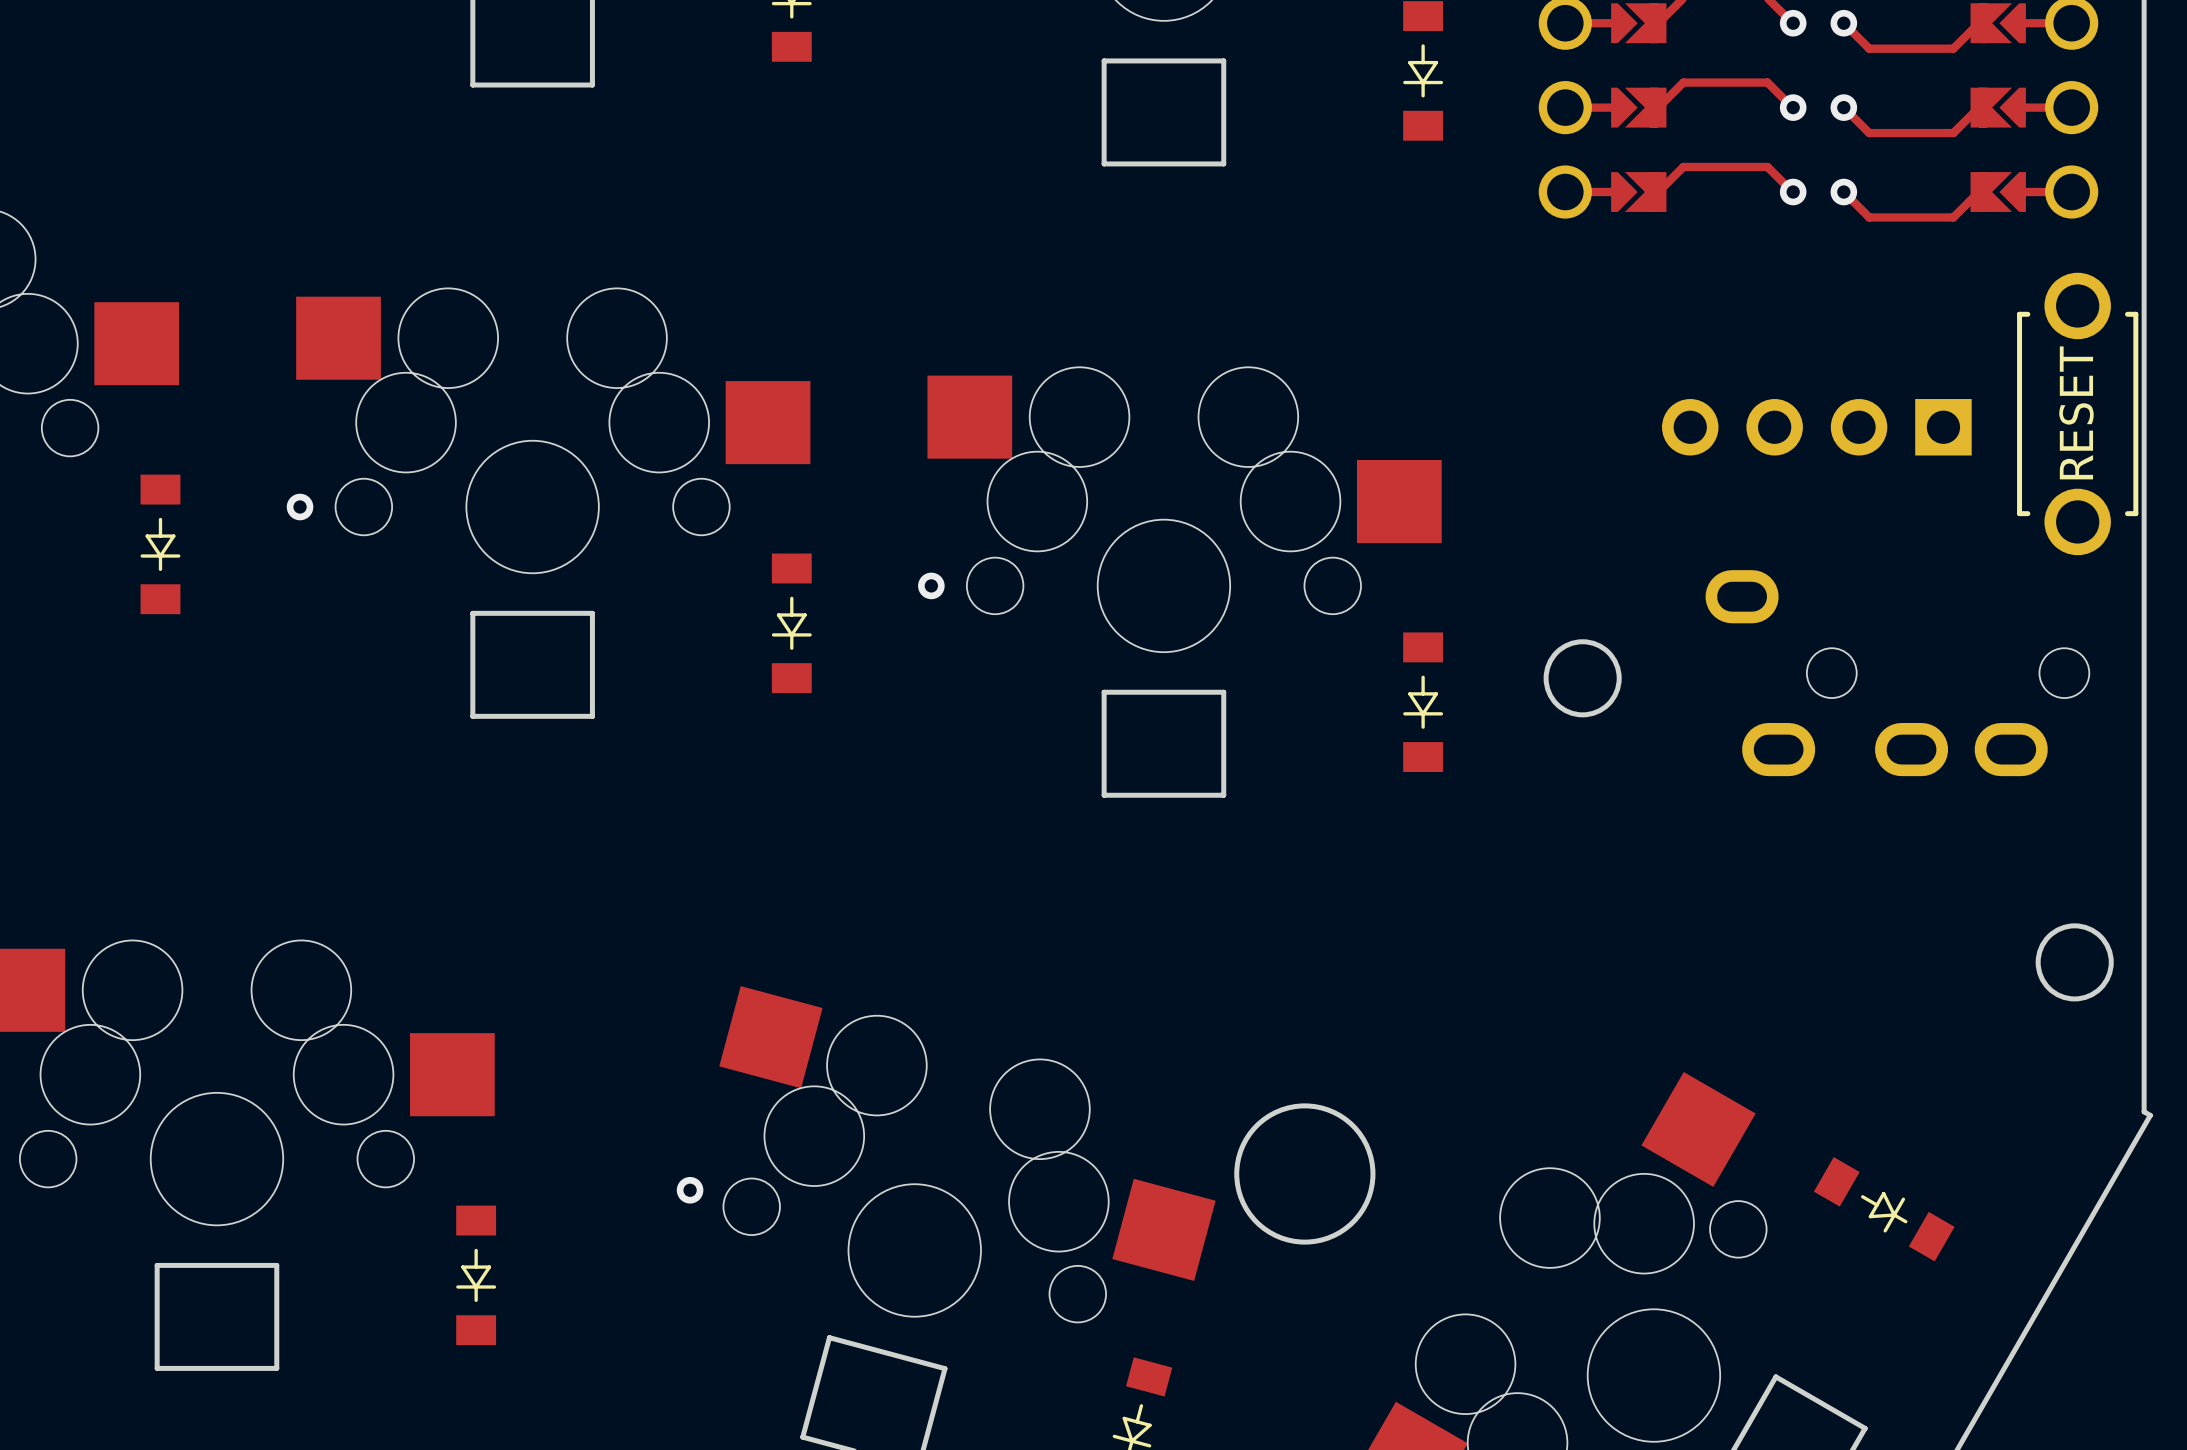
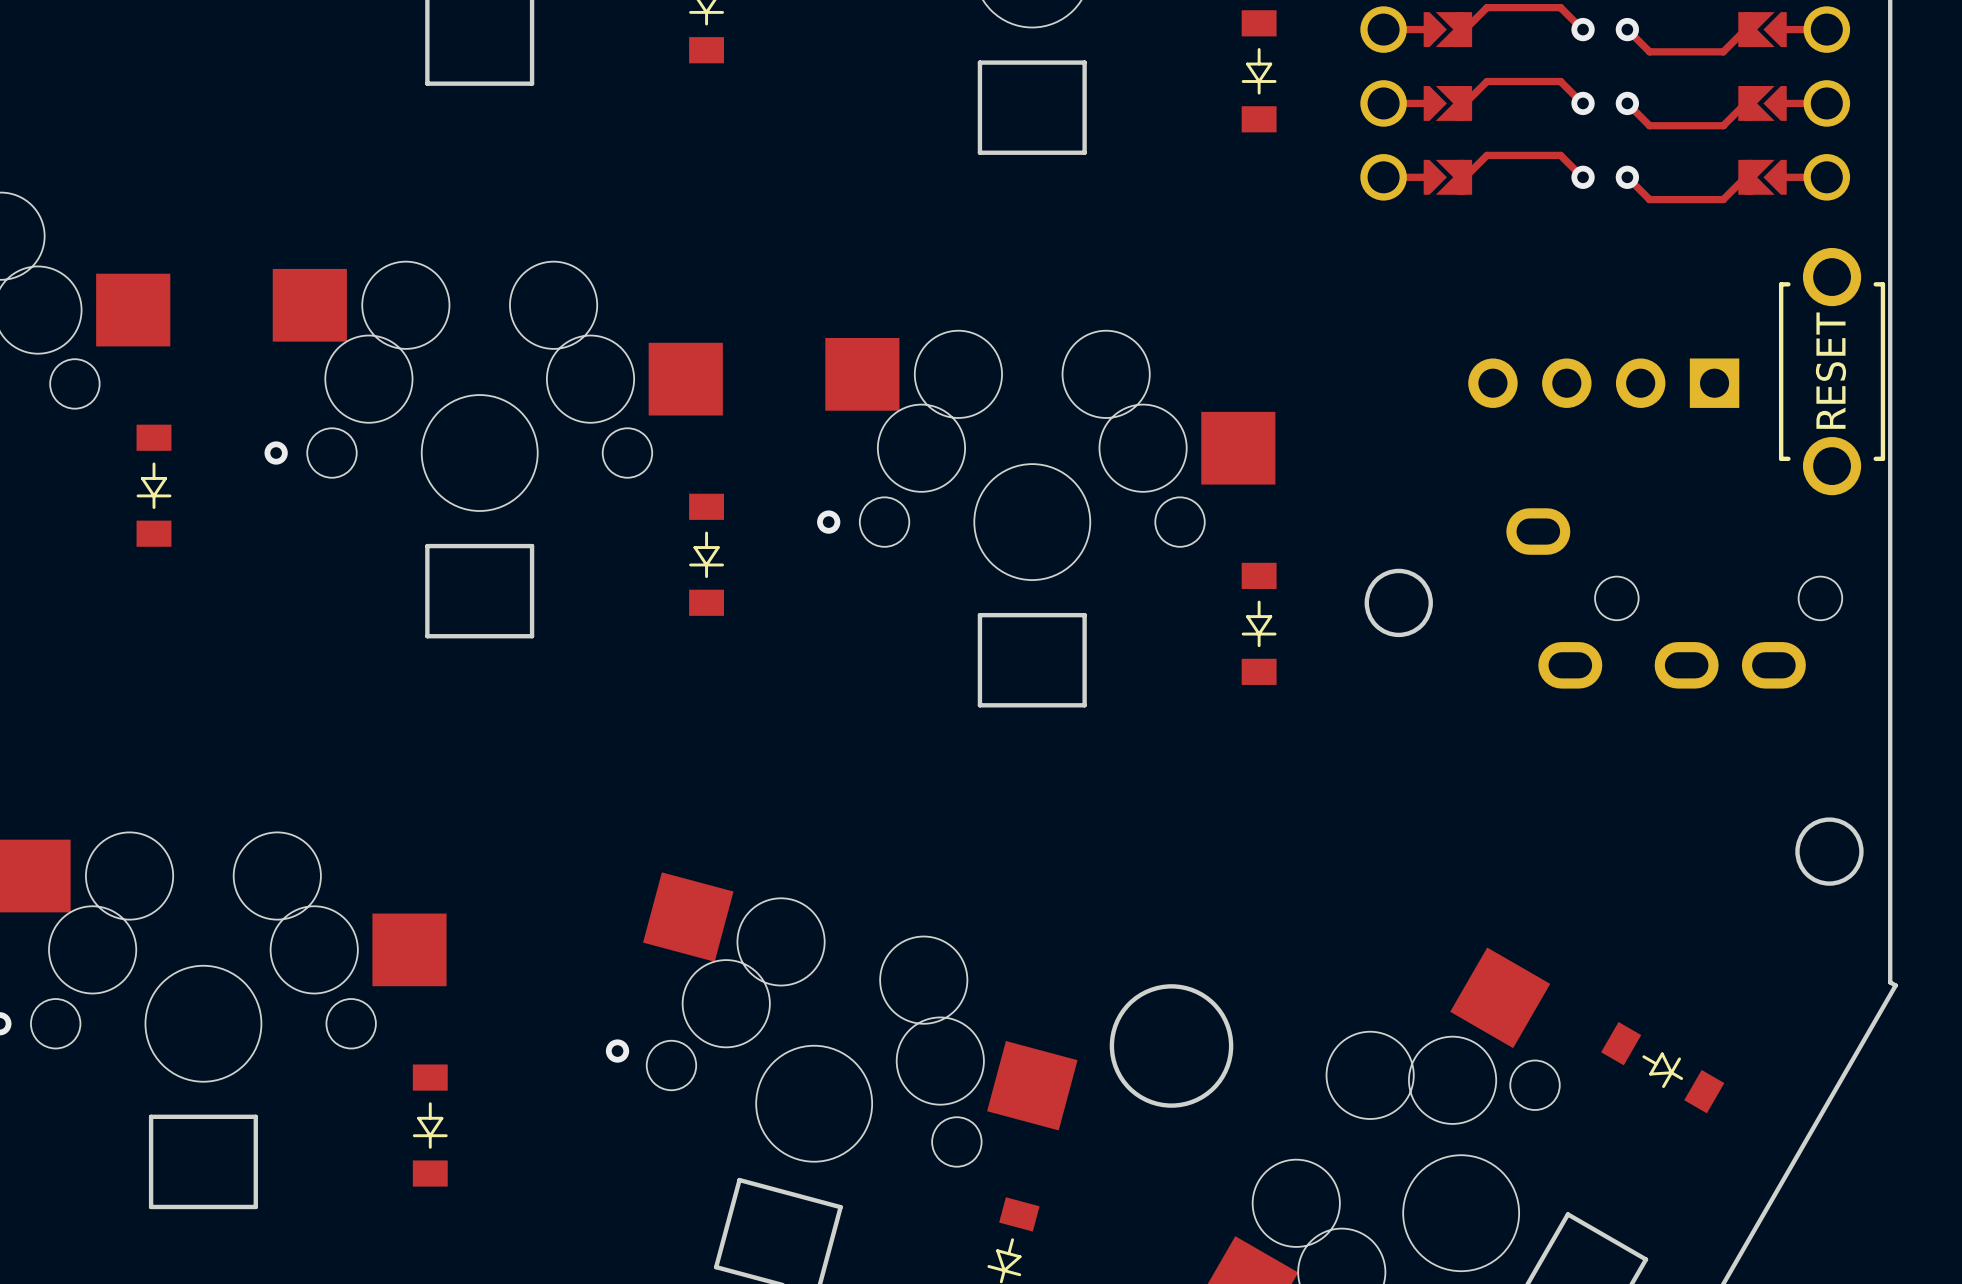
round board edge position: (1304, 1173) -> (1171, 1045)

